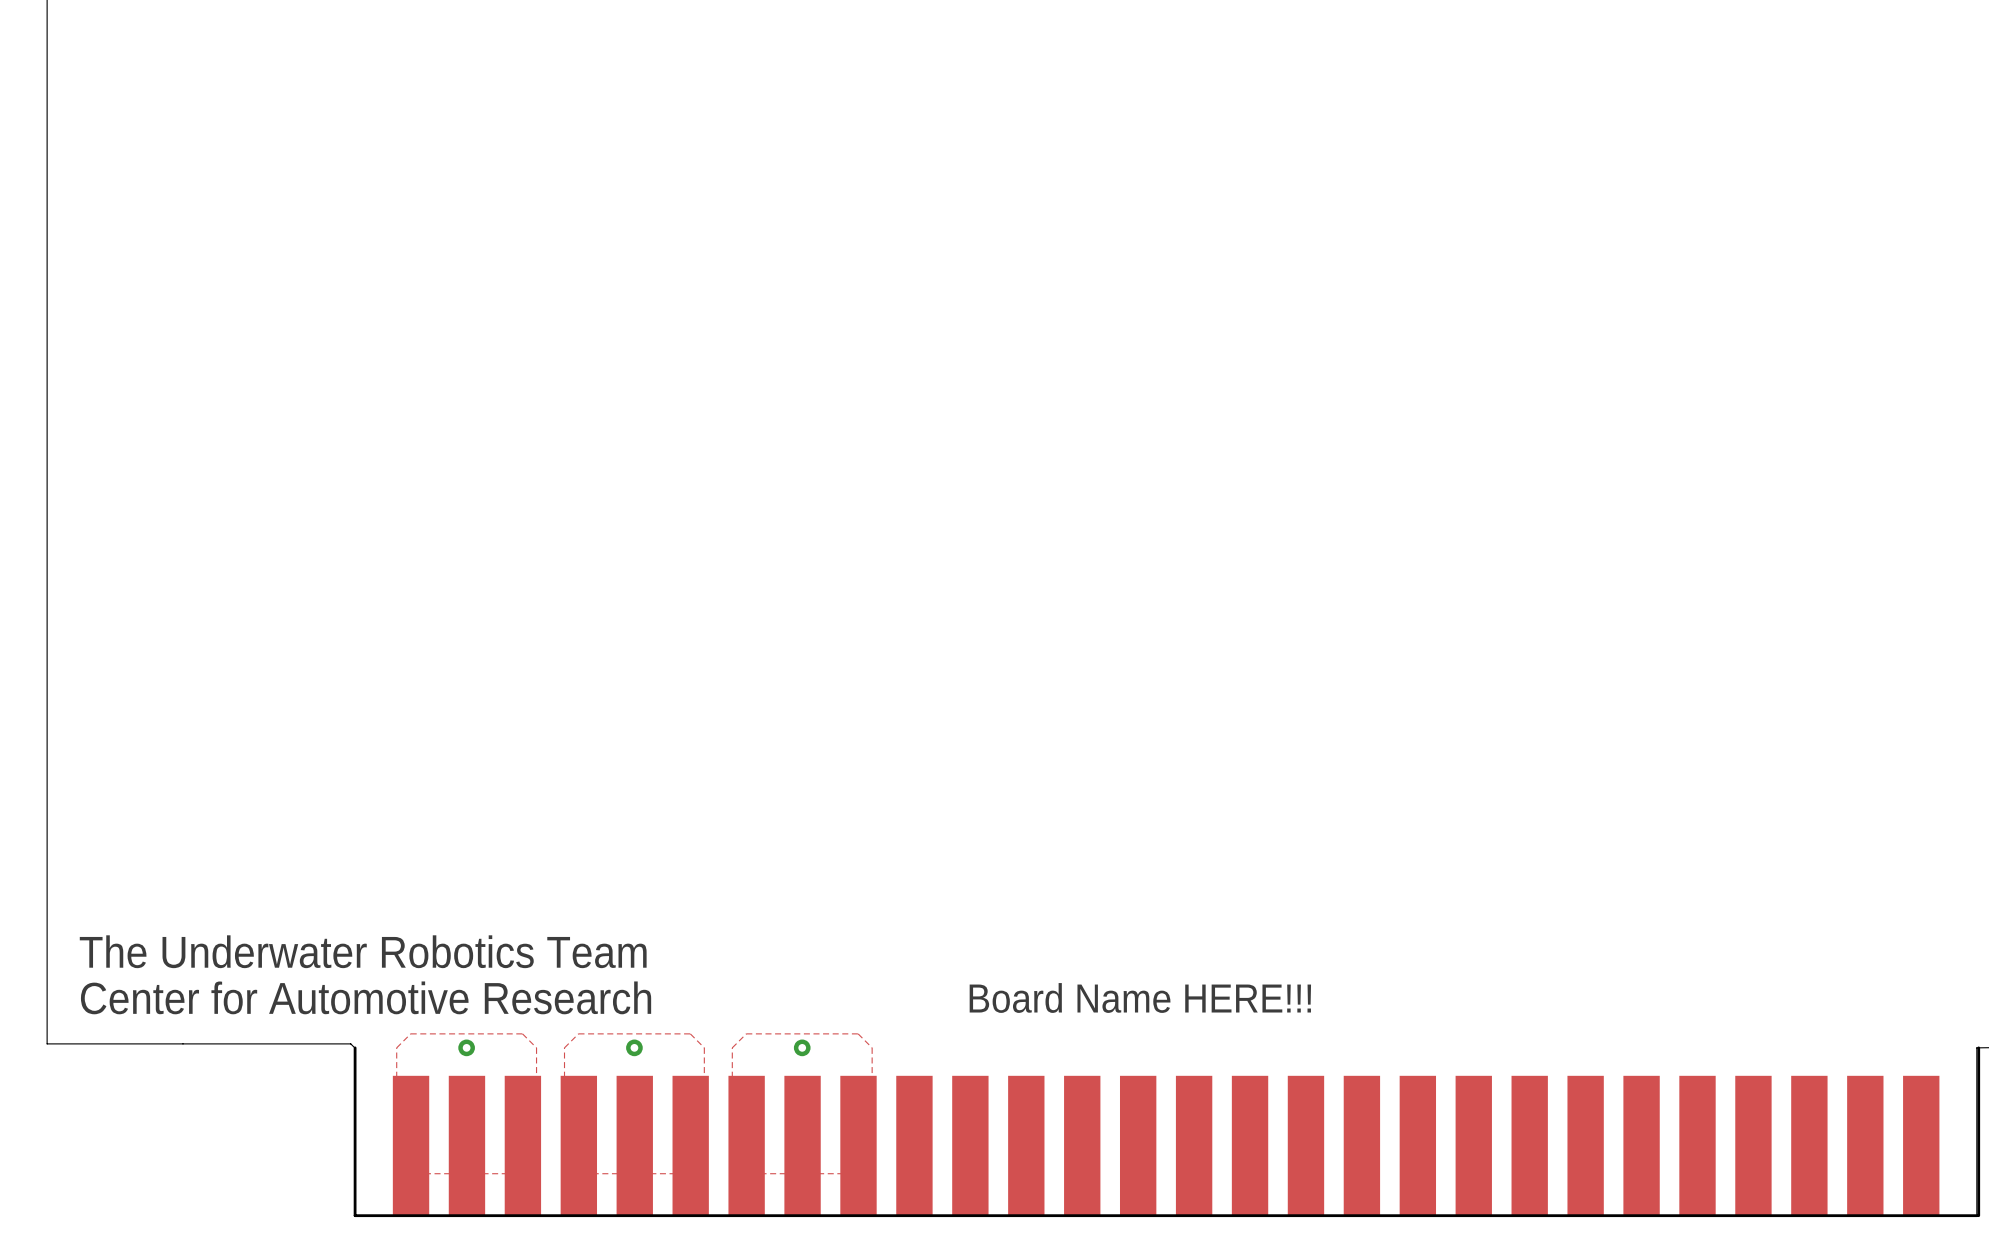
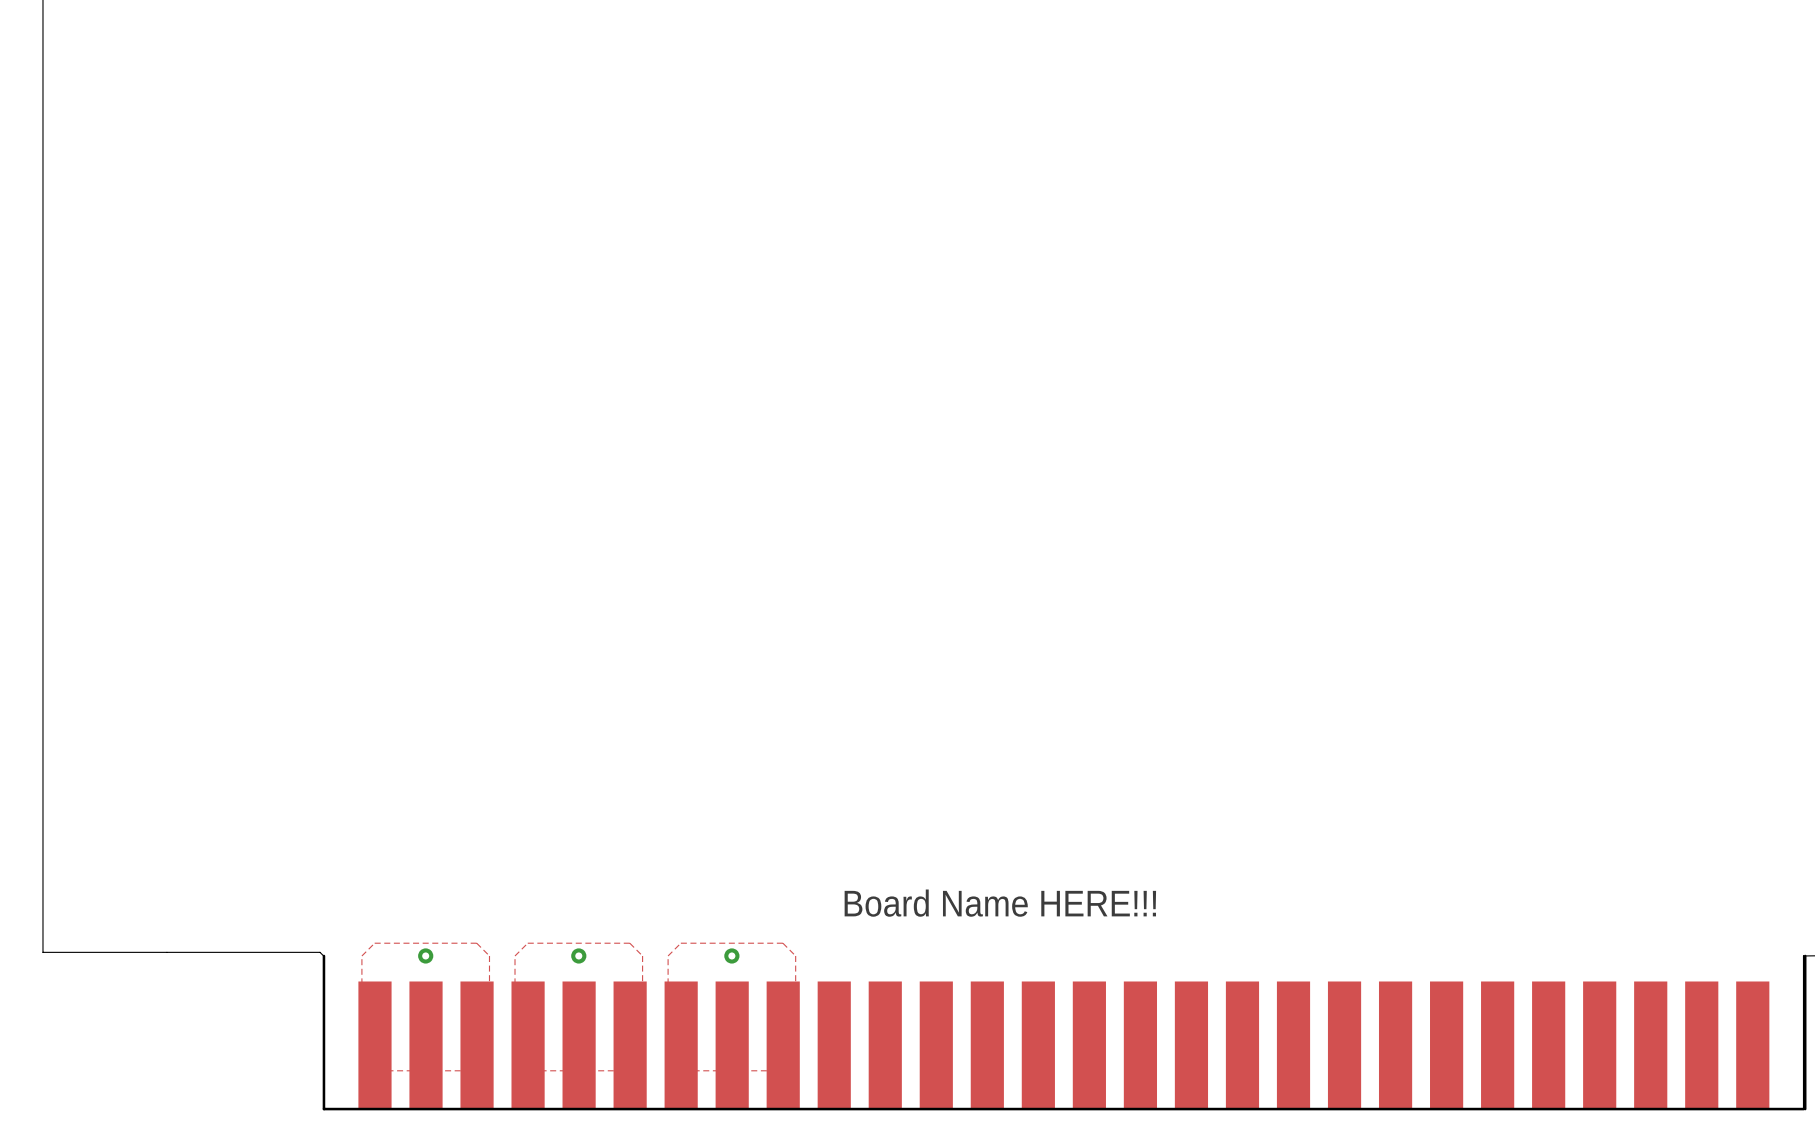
text: The Underwater Robotics Team (363, 951) -> none
text: Center for Automotive Research (366, 997) -> none
text position: Board Name HERE!!! (1140, 997) -> Board Name HERE!!! (1000, 903)

